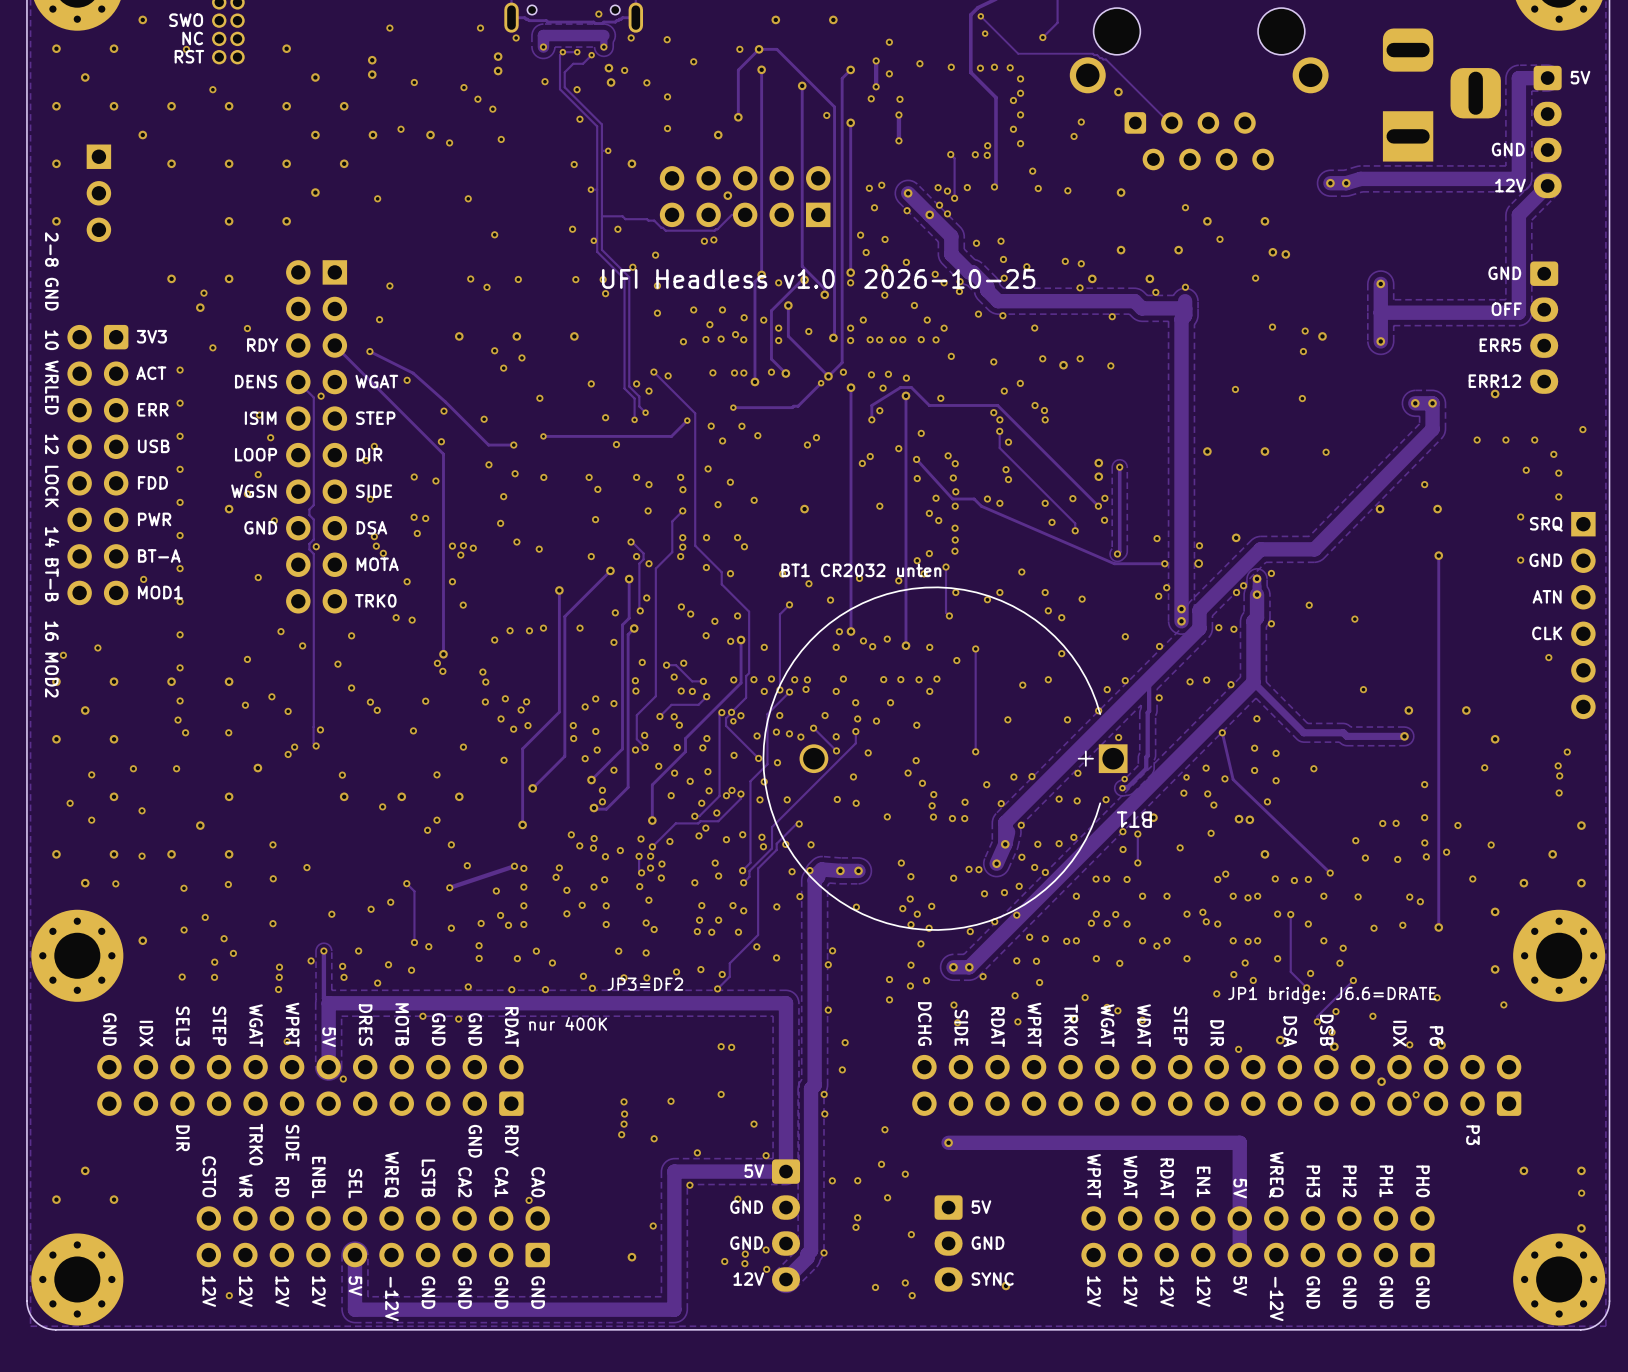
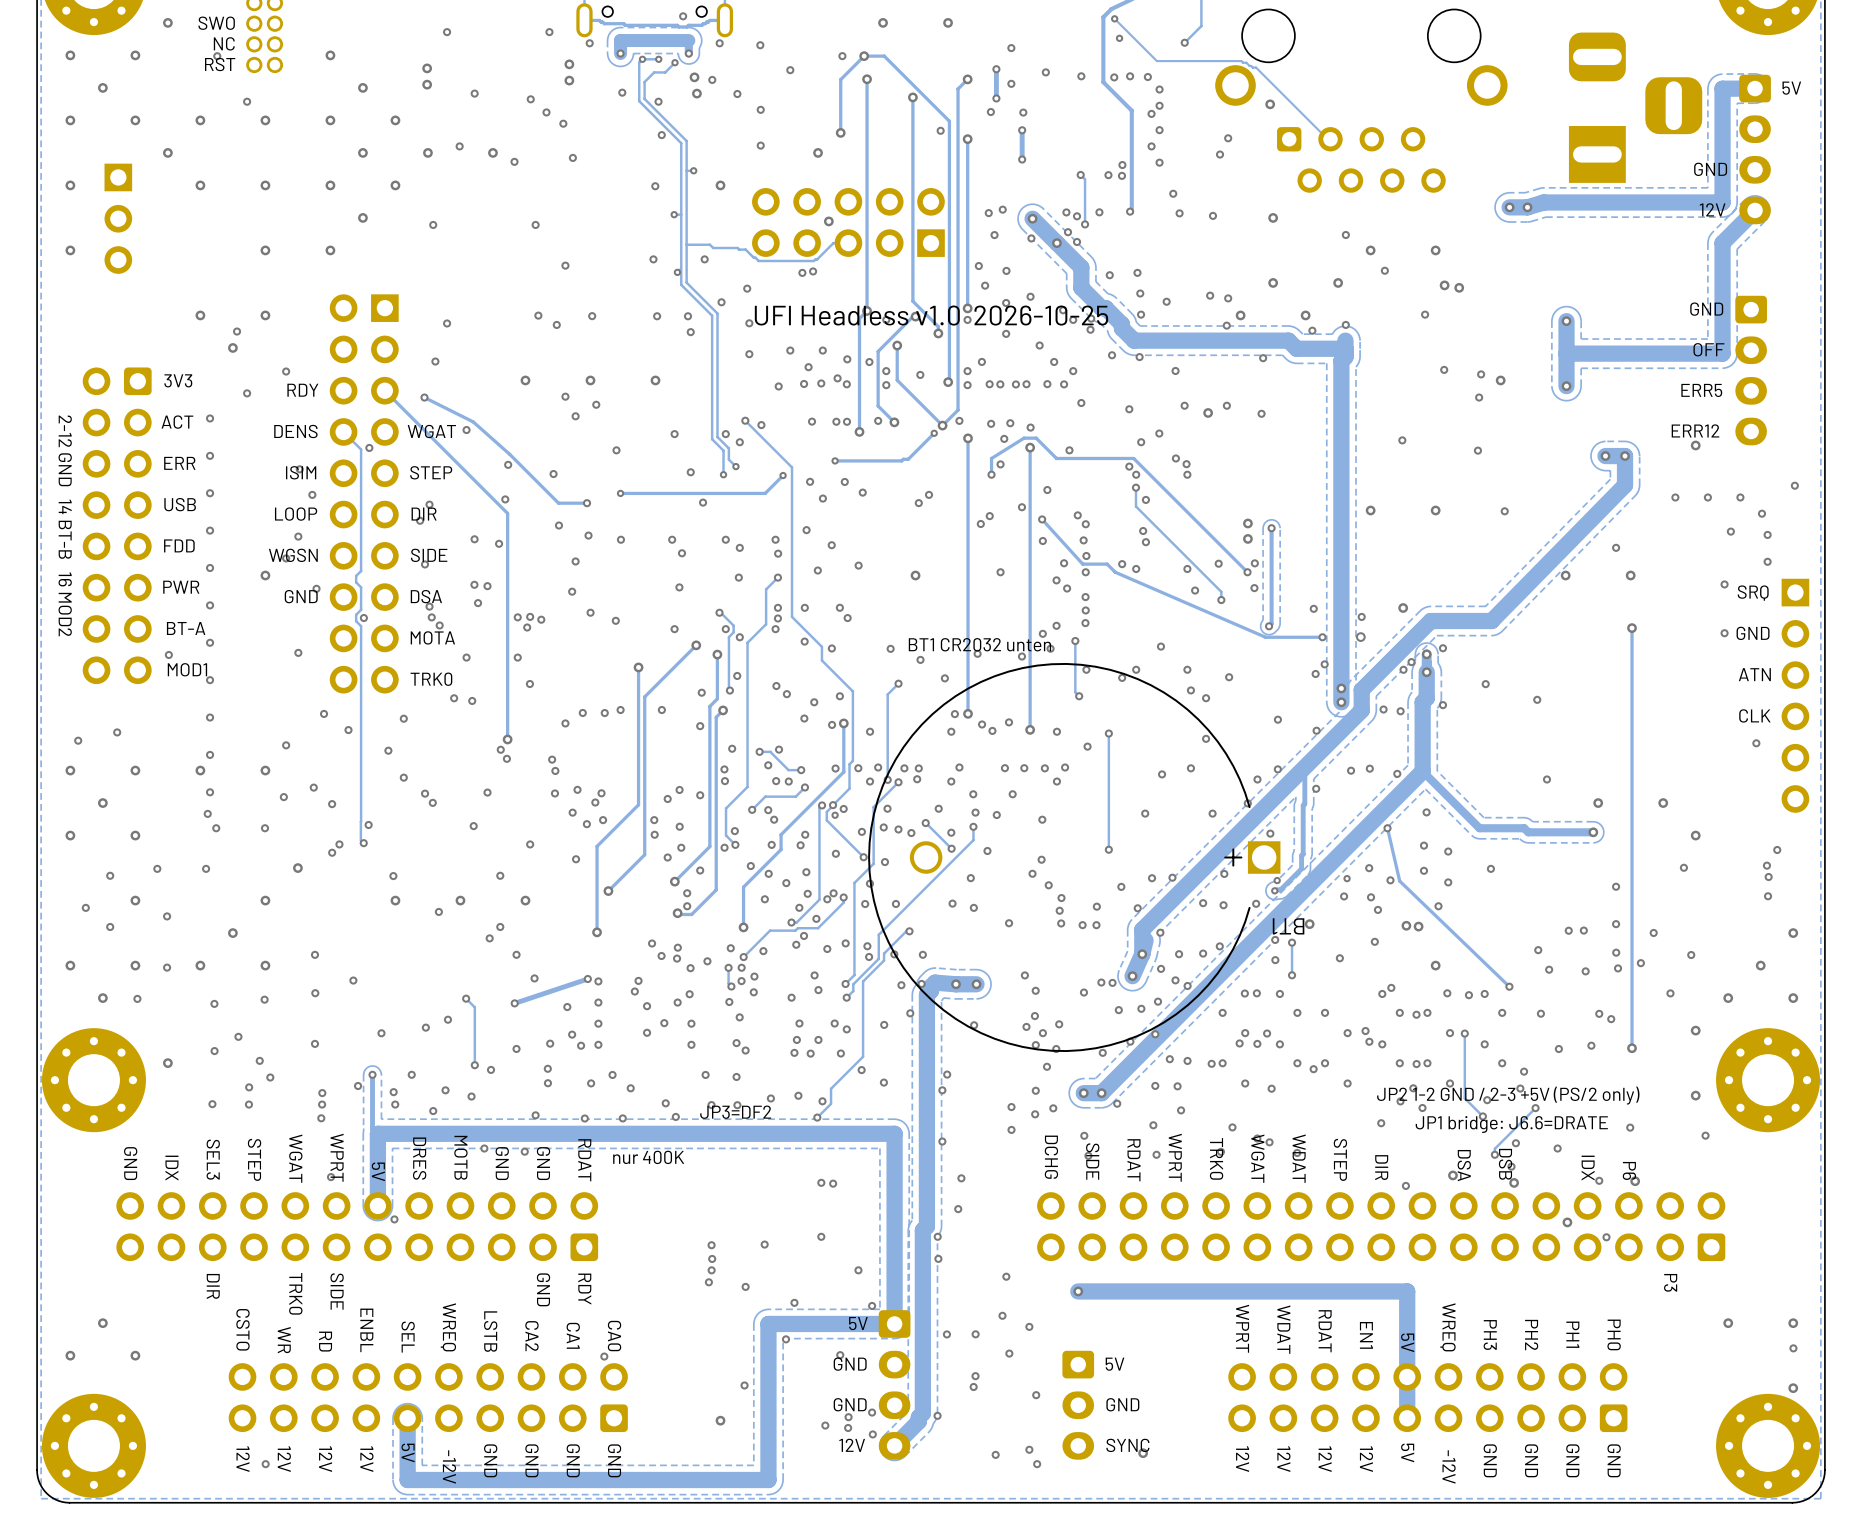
text: 2-8 GND 10 WRLED 12 LOCK 14 BT-B 16 MOD2 (52, 464) -> 2-12 GND 14 BT-B 16 MOD2 (65, 525)
text: none -> JP2 1-2 GND / 2-3 +5V (PS/2 only) (1508, 1095)

